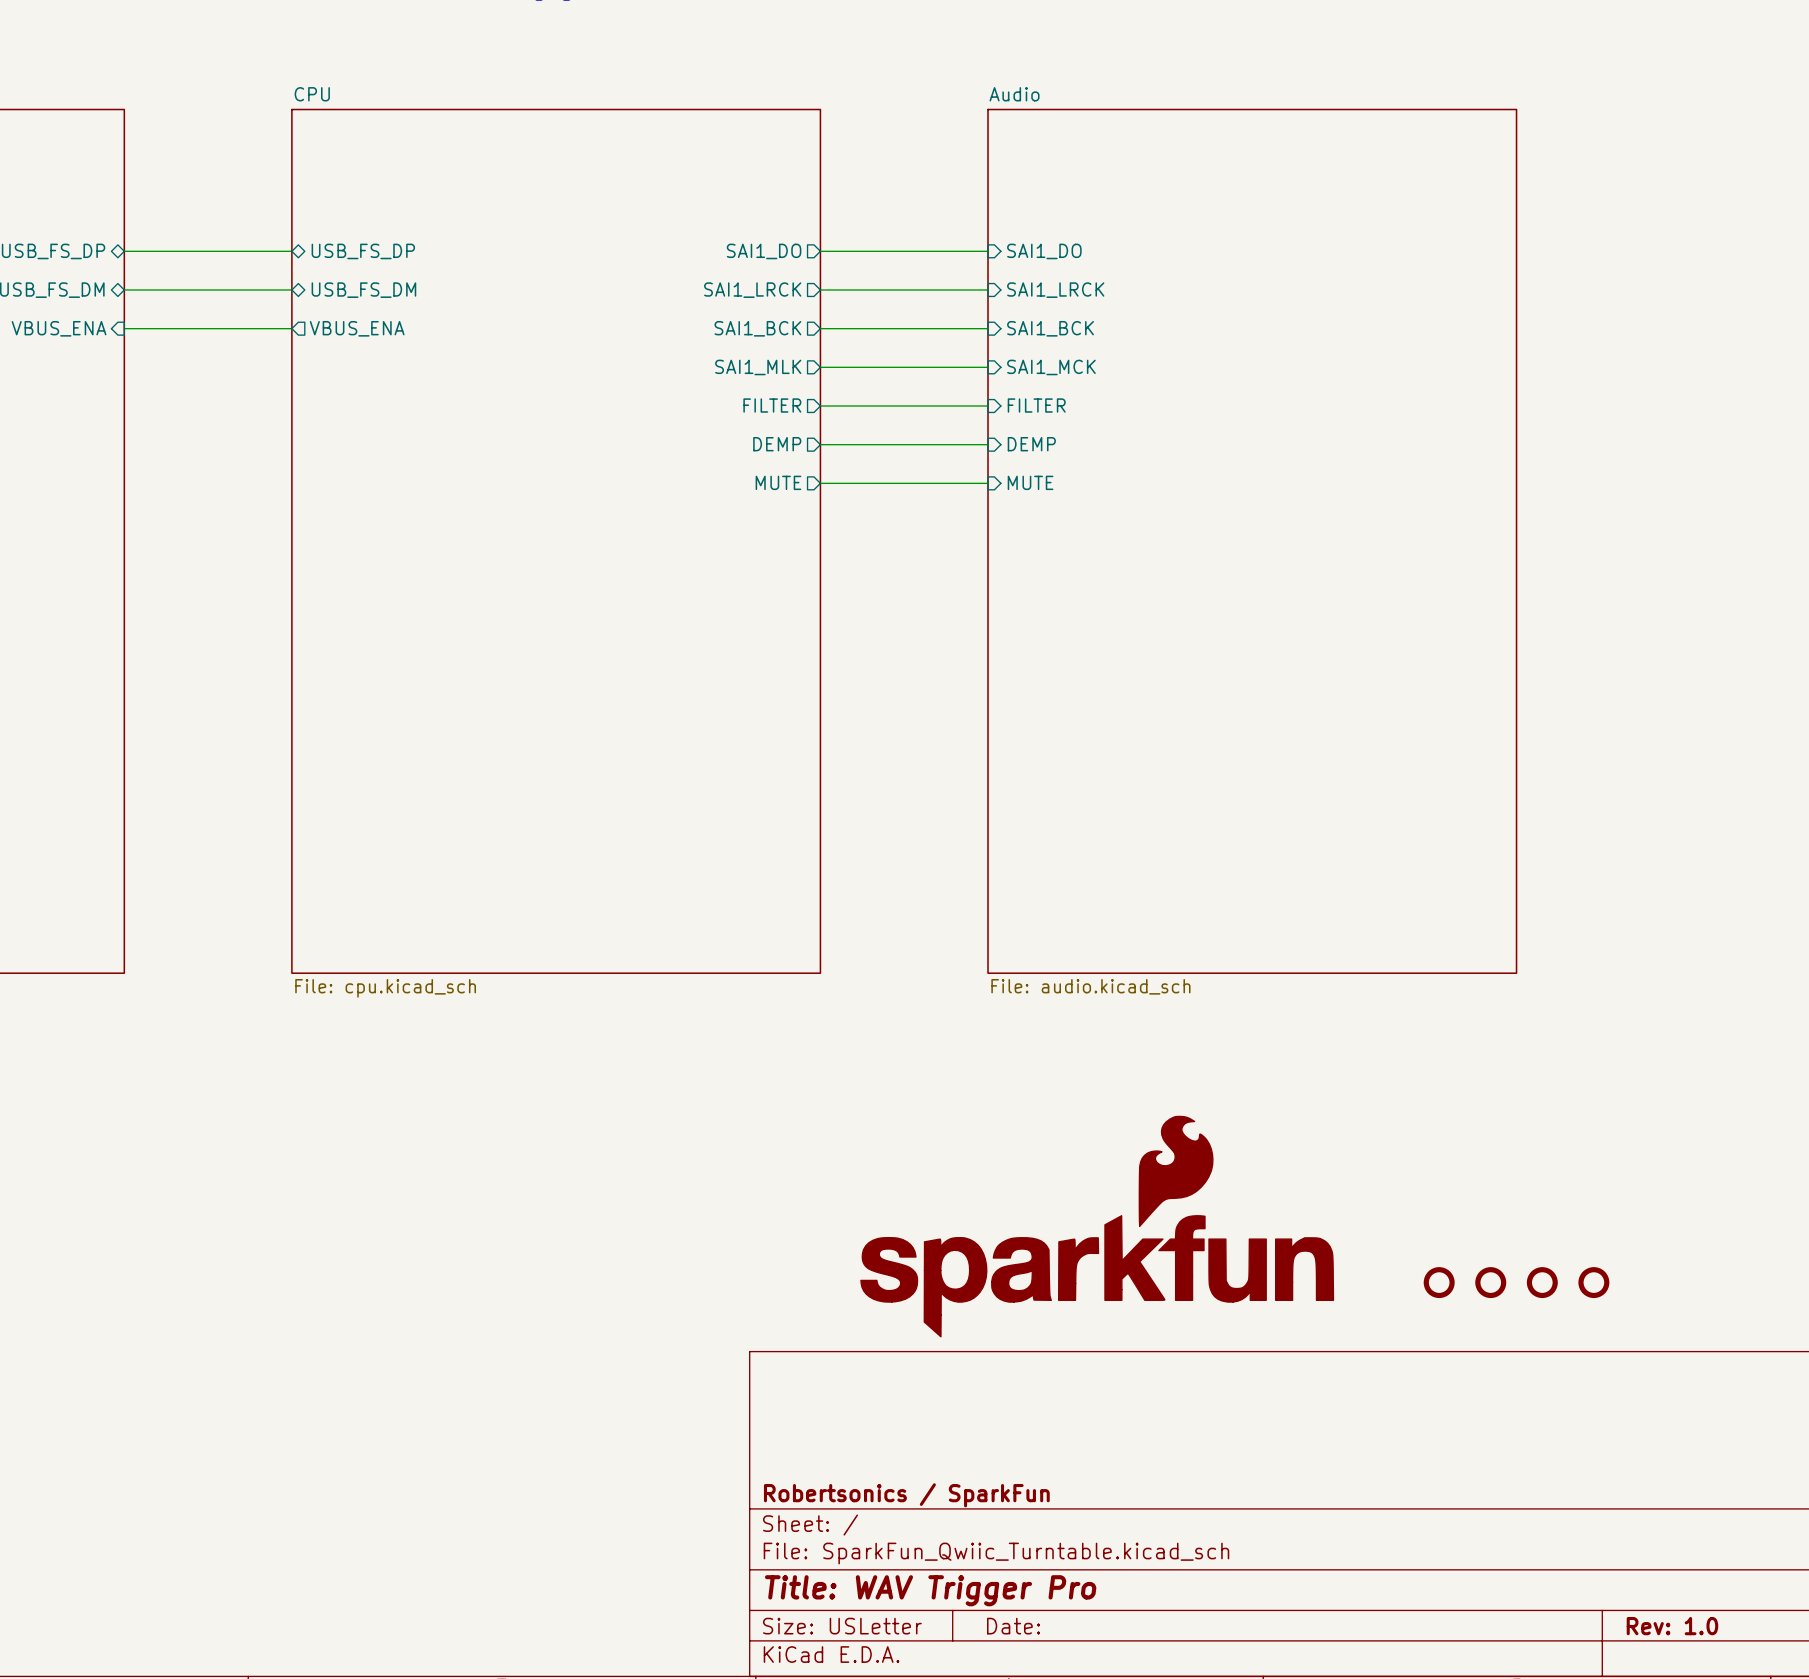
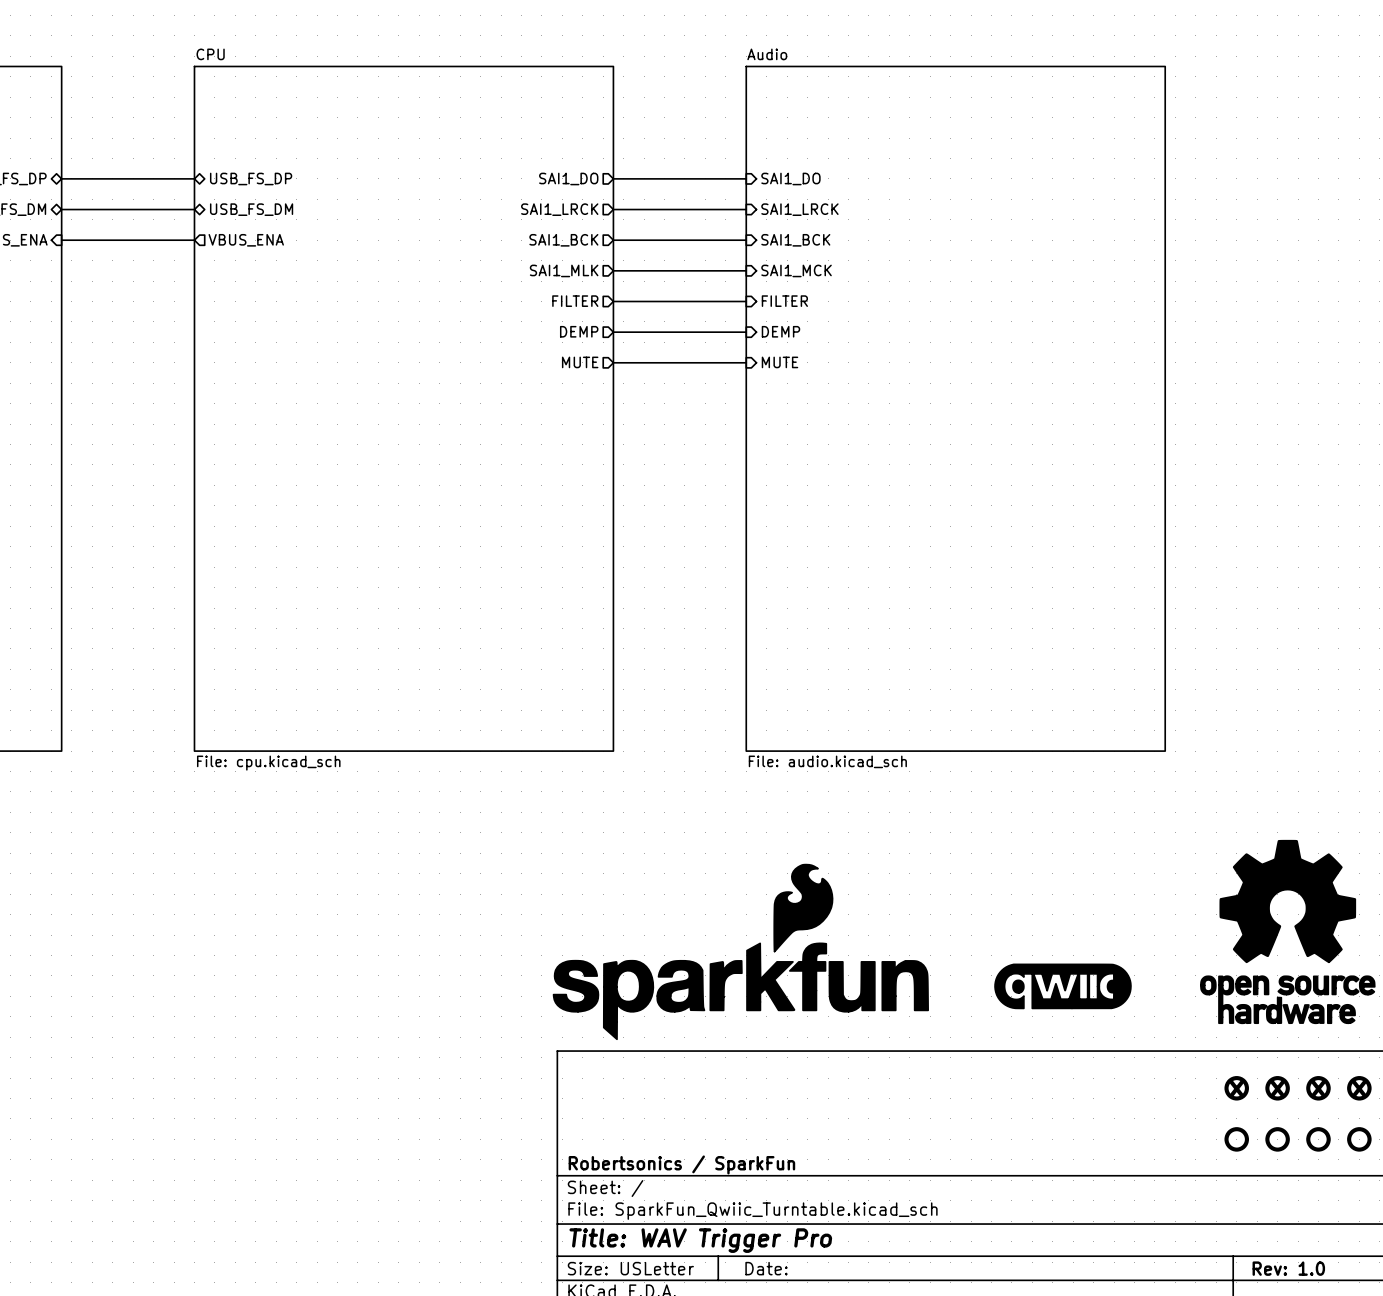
part: none -> (1287, 932)
part position: (1097, 1226) -> (740, 951)
part: none -> (1062, 986)
part: (1439, 1282) -> none
part: (1490, 1282) -> none
part: (1542, 1282) -> none
part: (1593, 1282) -> none
part: none -> (1236, 1088)
part: none -> (1277, 1088)
part: none -> (1318, 1088)
part: none -> (1359, 1088)
part: none -> (1236, 1139)
part: none -> (1277, 1139)
part: none -> (1318, 1139)
part: none -> (1359, 1139)

